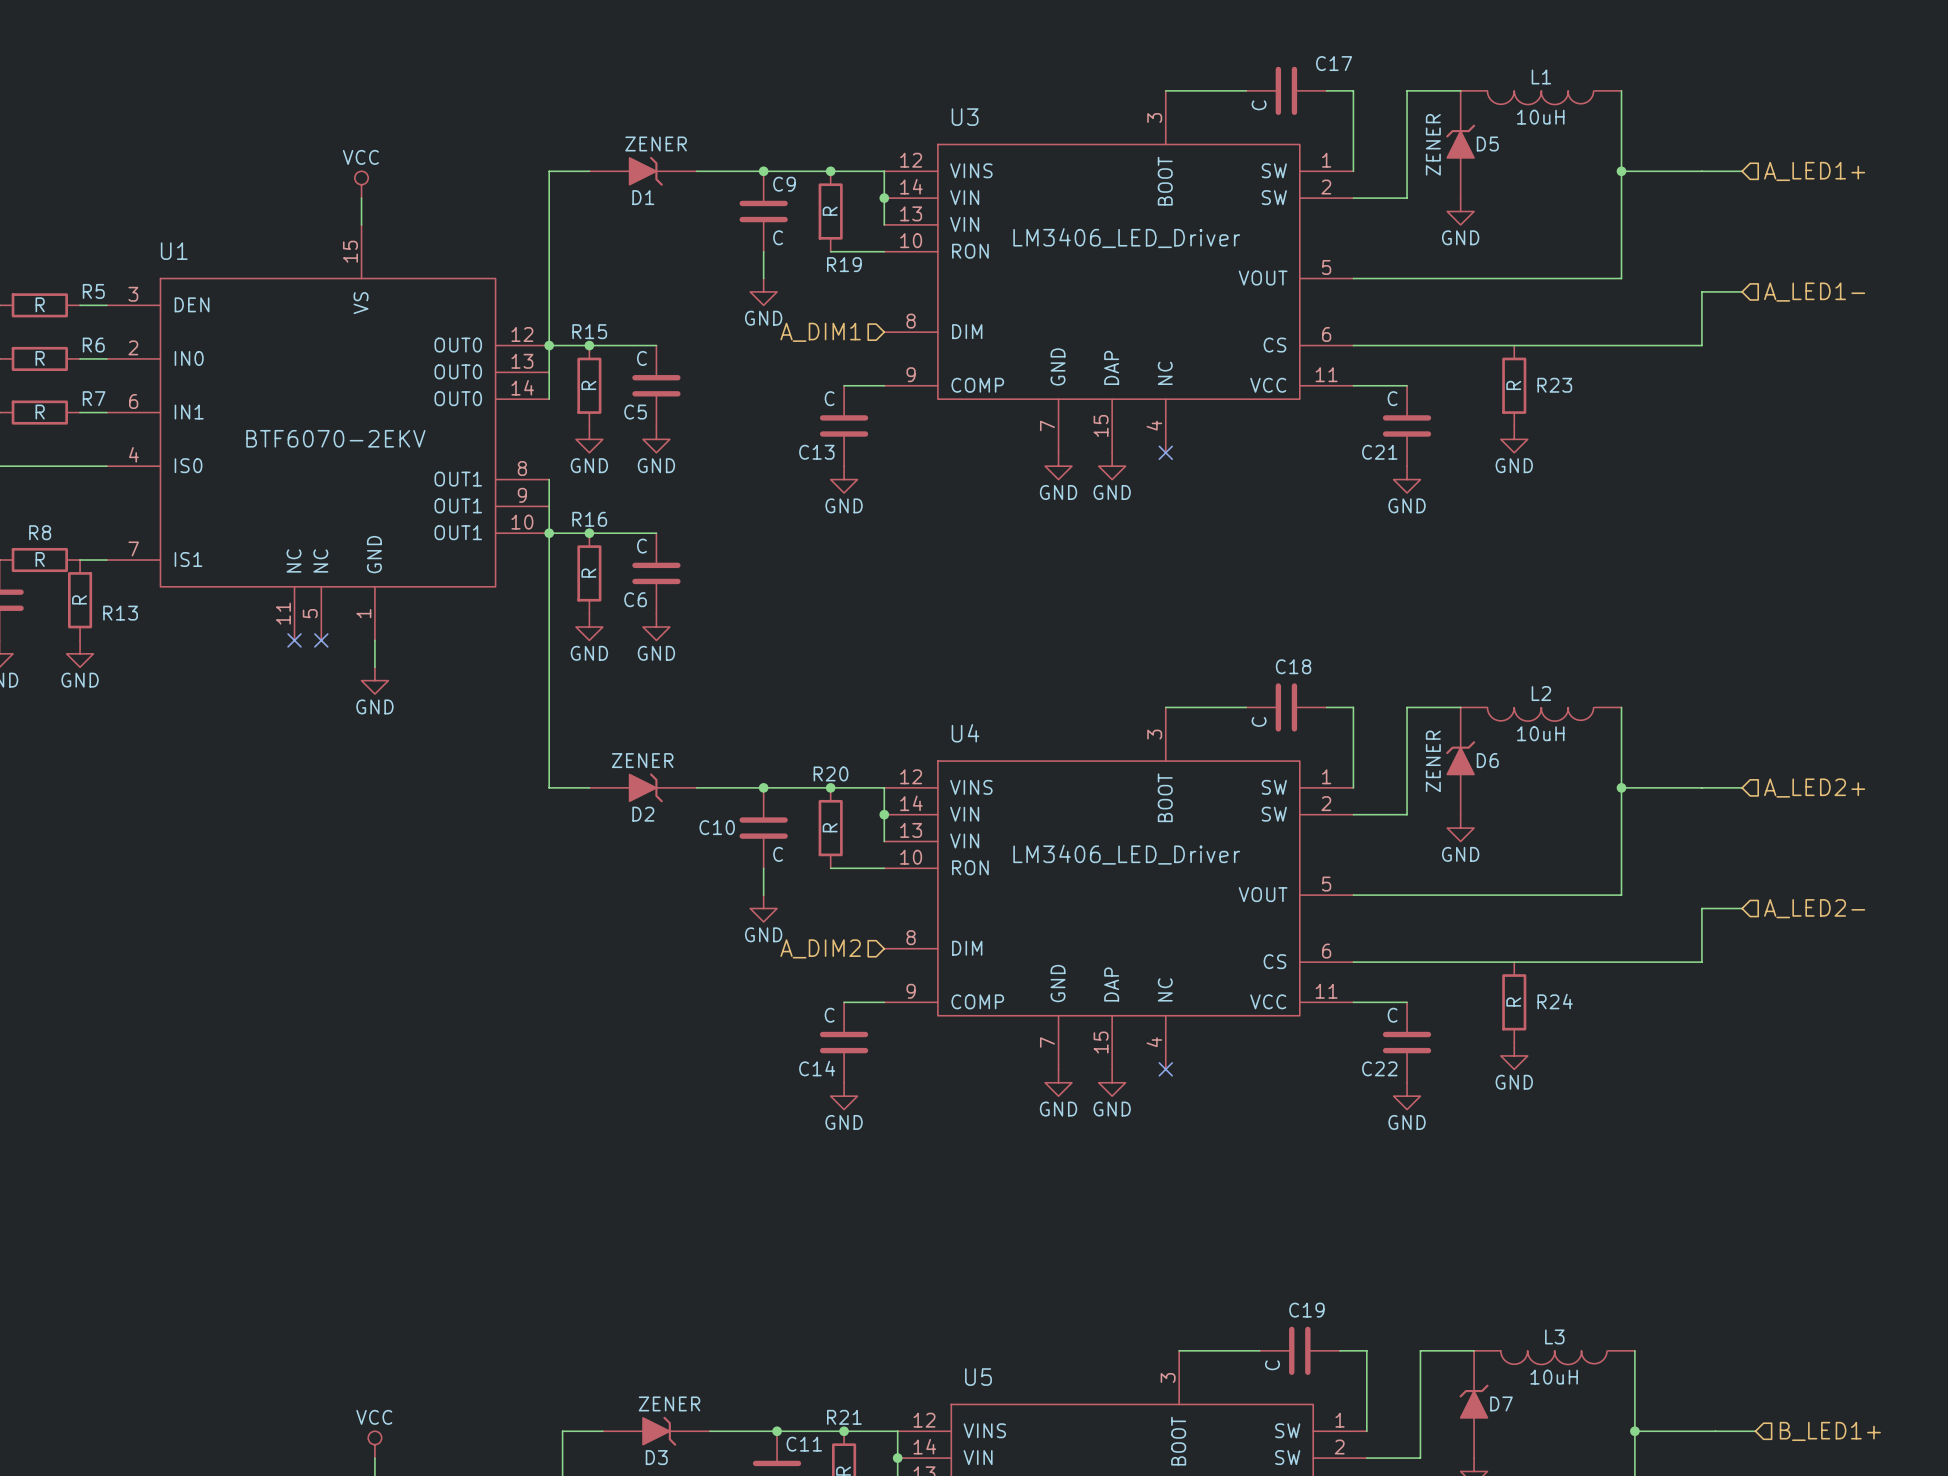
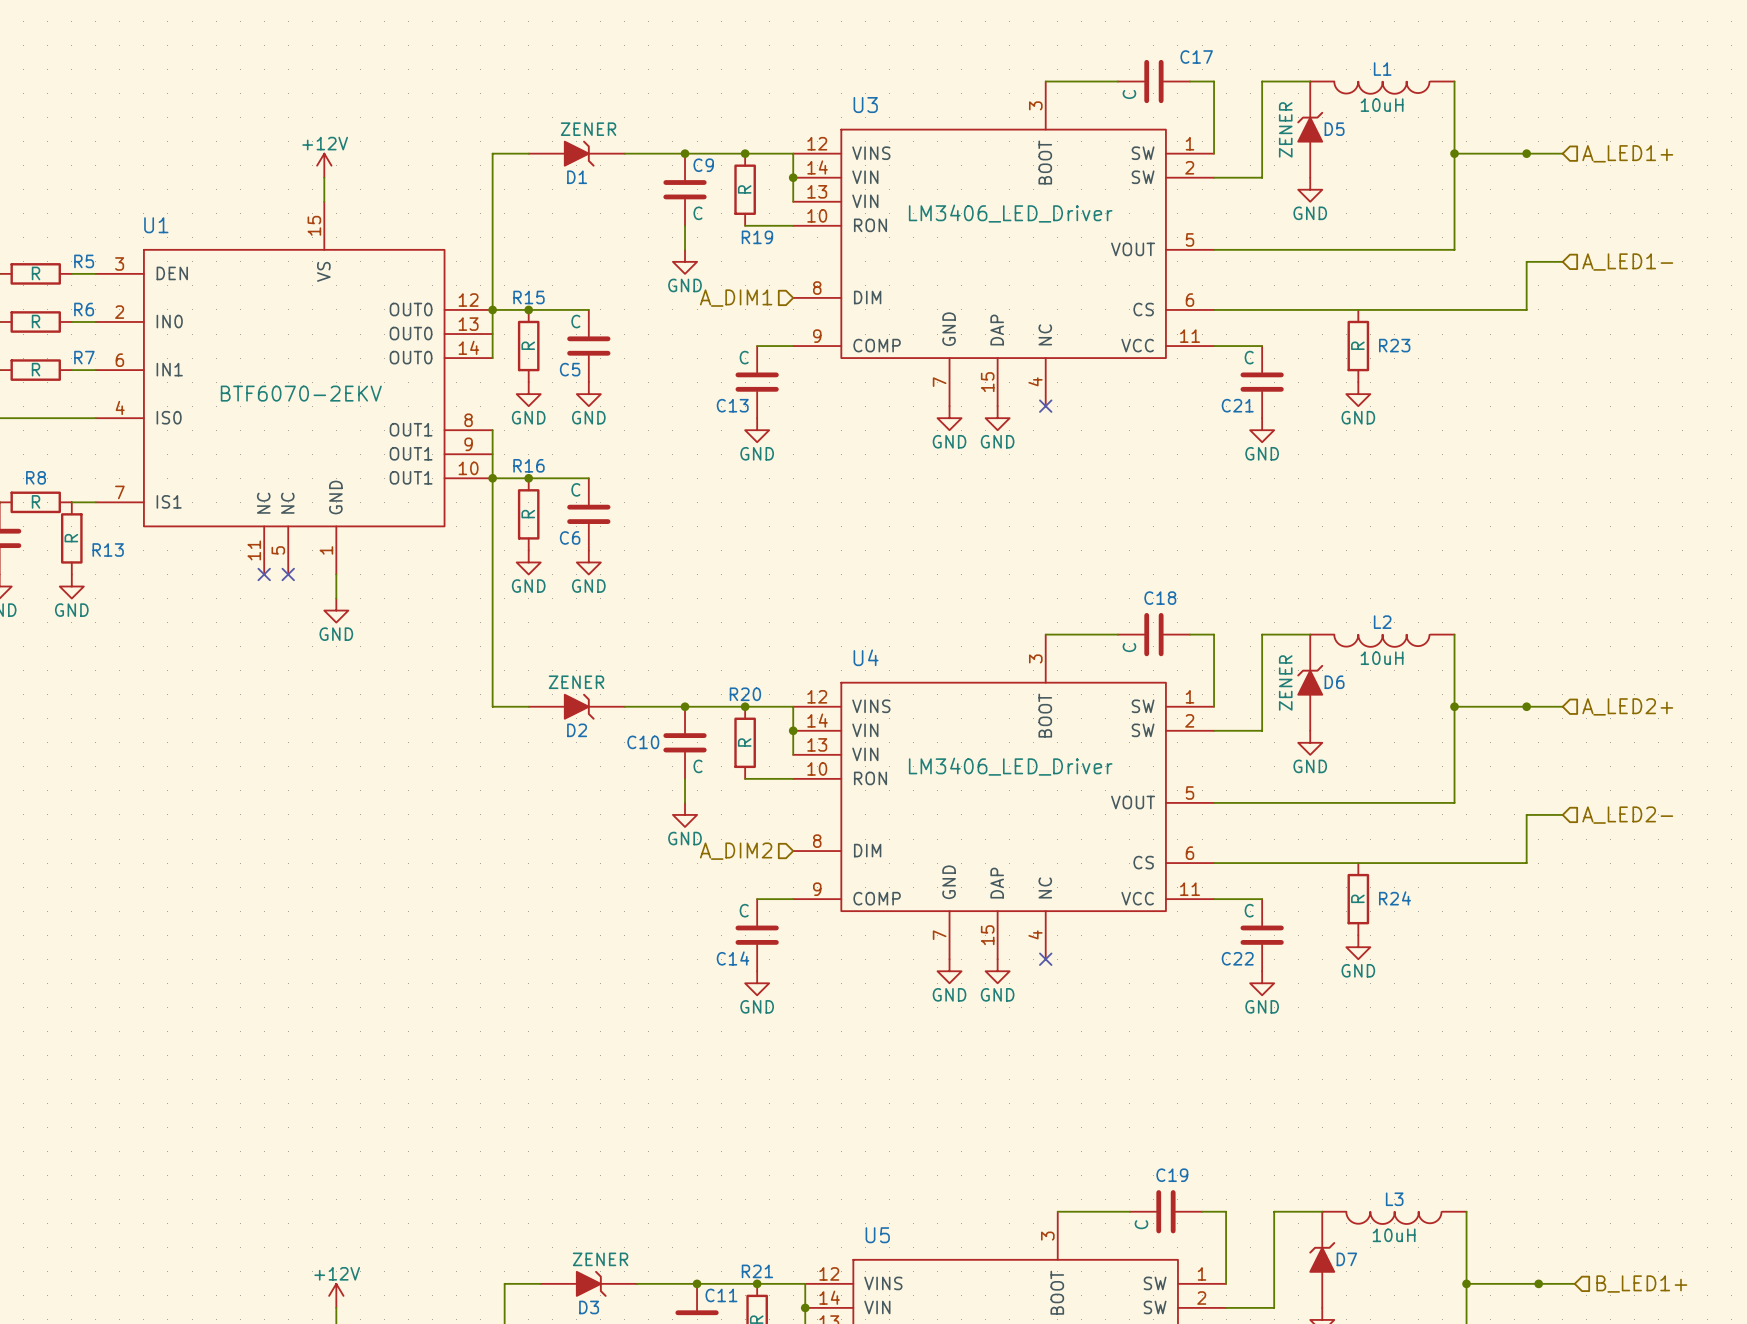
junction: none -> (1526, 153)
power symbol: VCC (361, 184) -> +12V (324, 165)
junction: none -> (1526, 706)
junction: none -> (1538, 1283)
power symbol: VCC (374, 1444) -> +12V (336, 1295)

